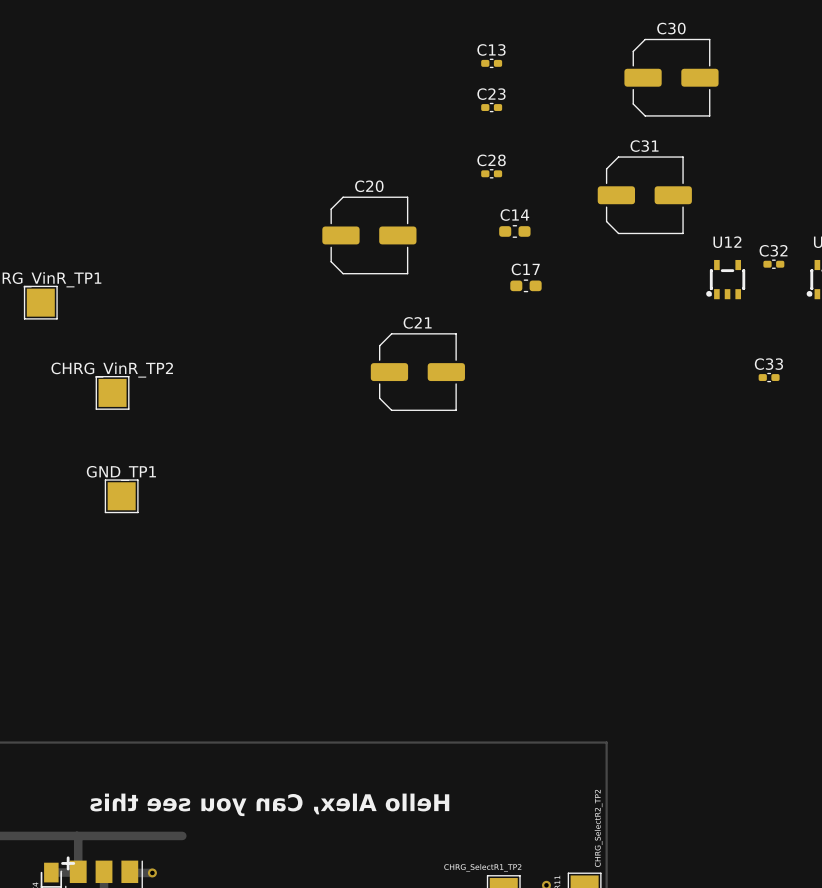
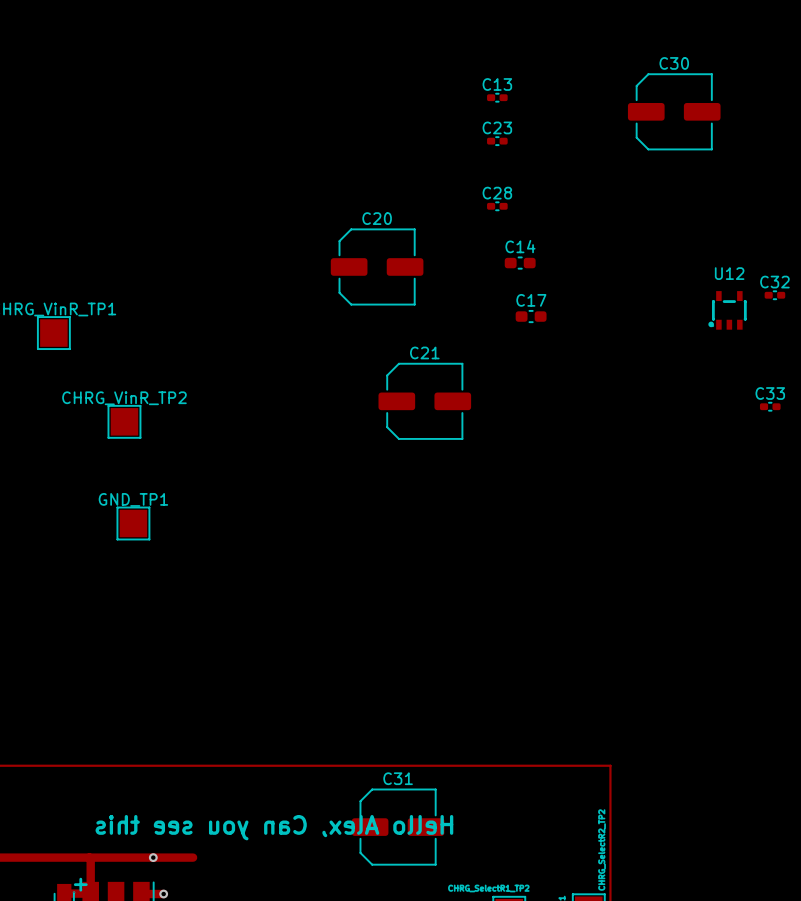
C31 position: (644, 195) -> (398, 827)
via: none -> (153, 857)

